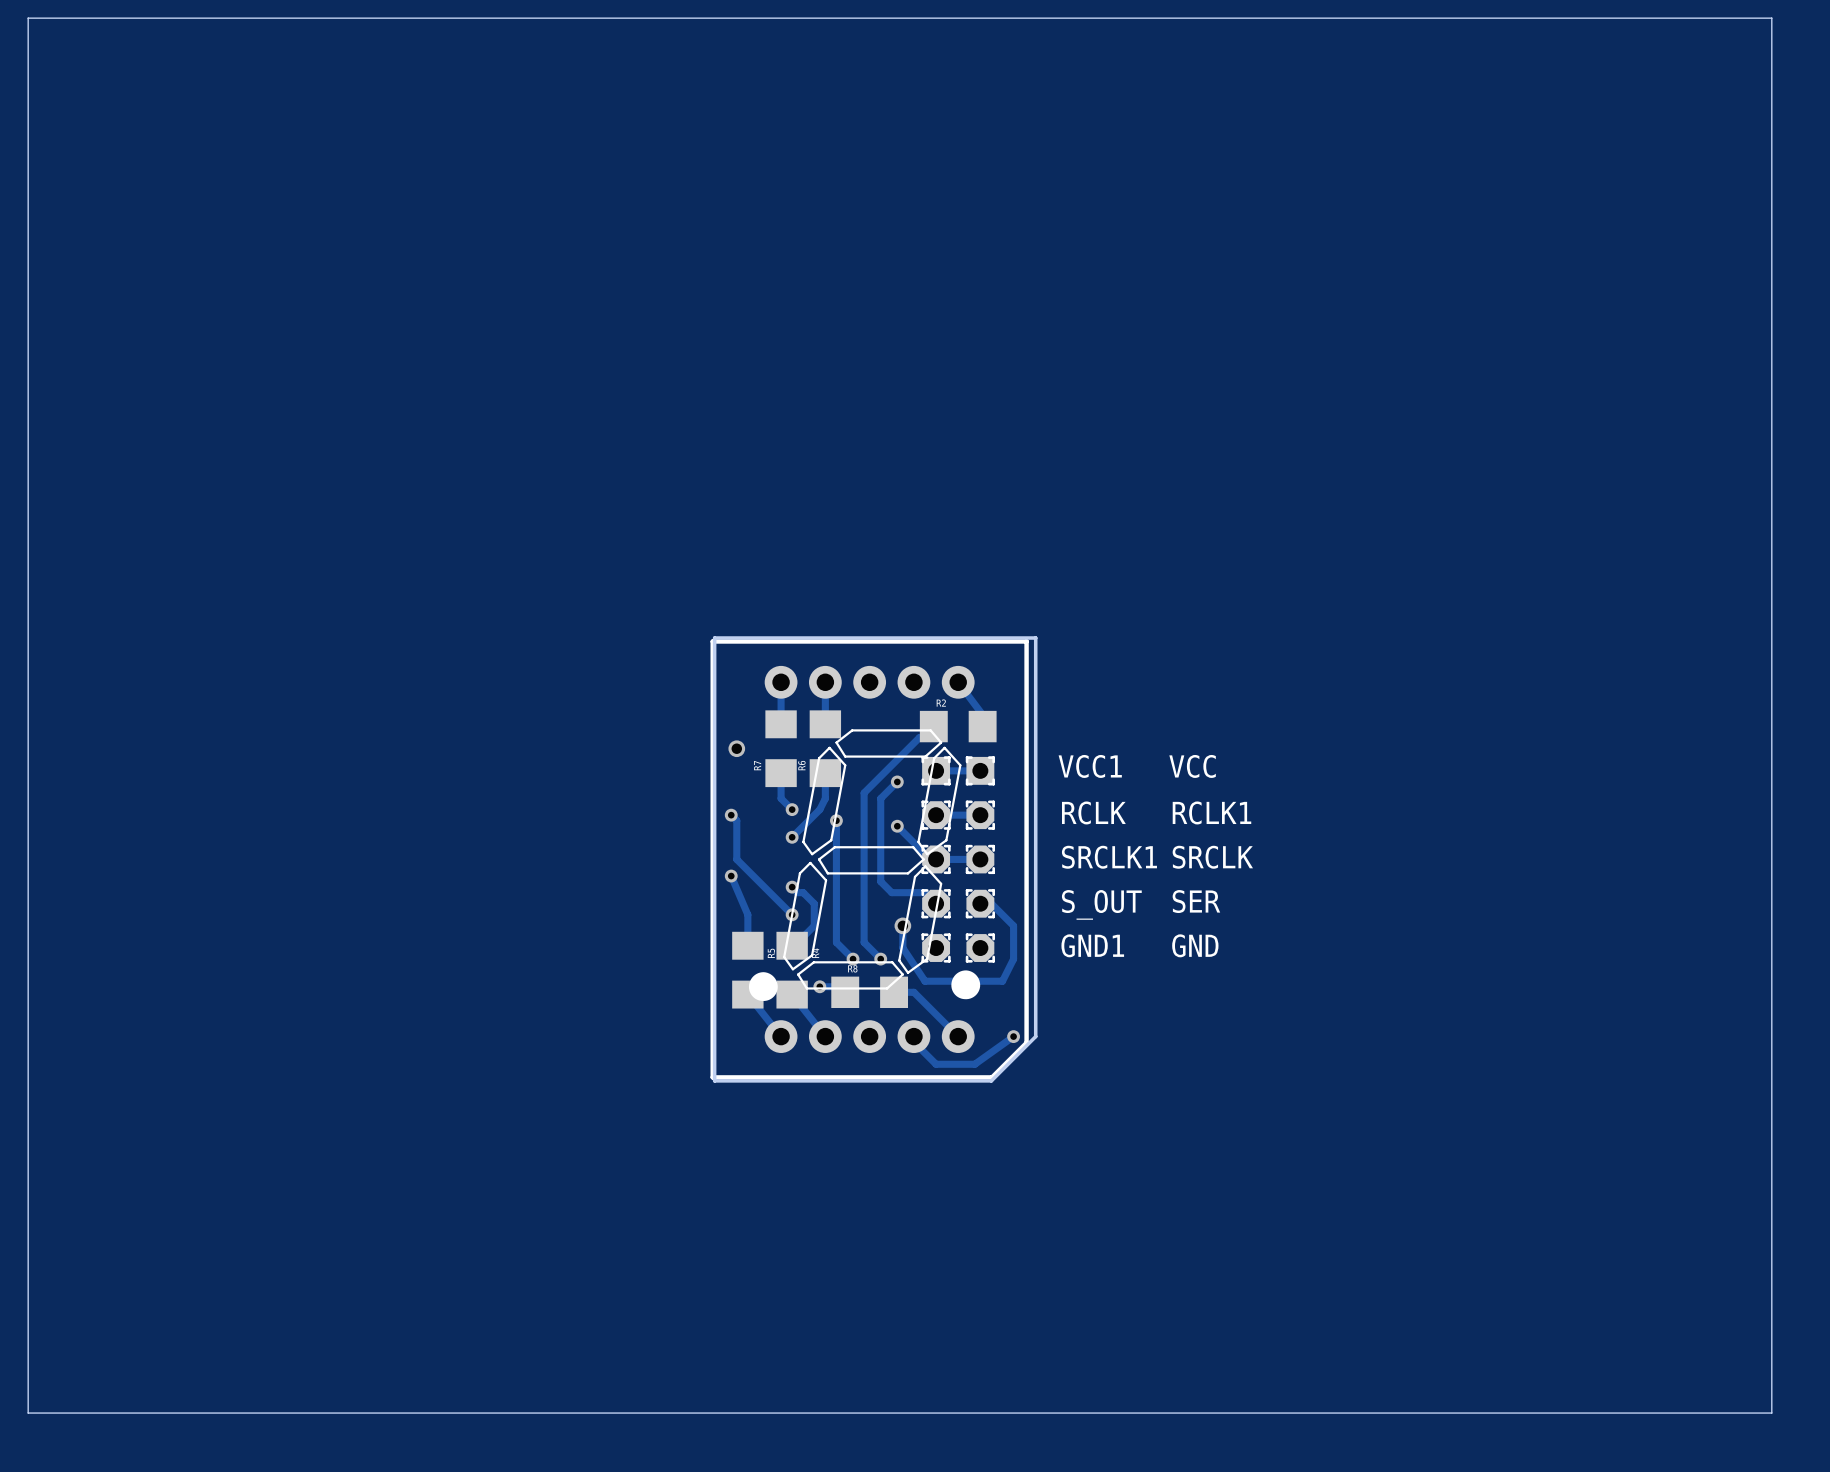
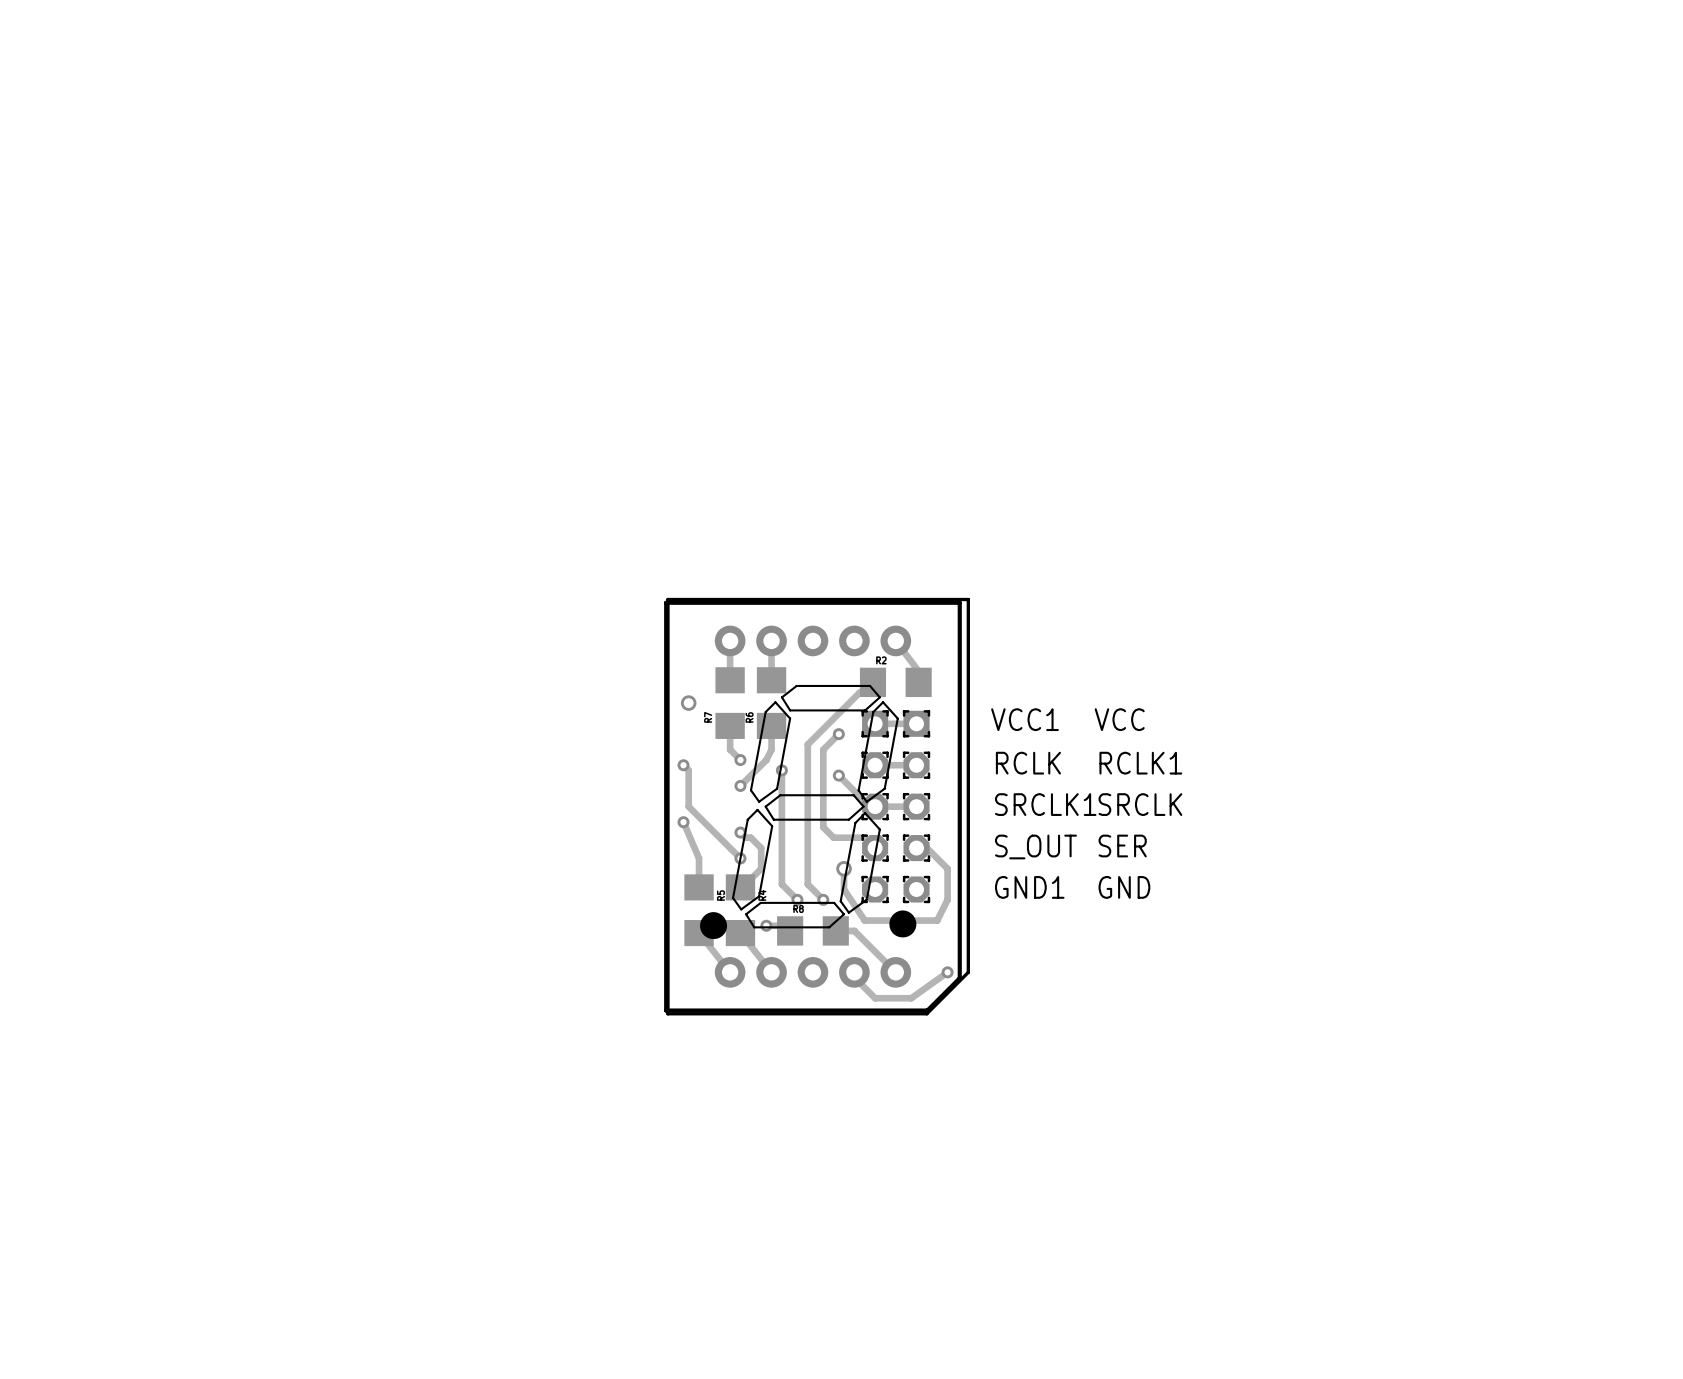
board edge: (28, 18) (1771, 18) (1771, 1413) (28, 1413) (28, 18) -> none

